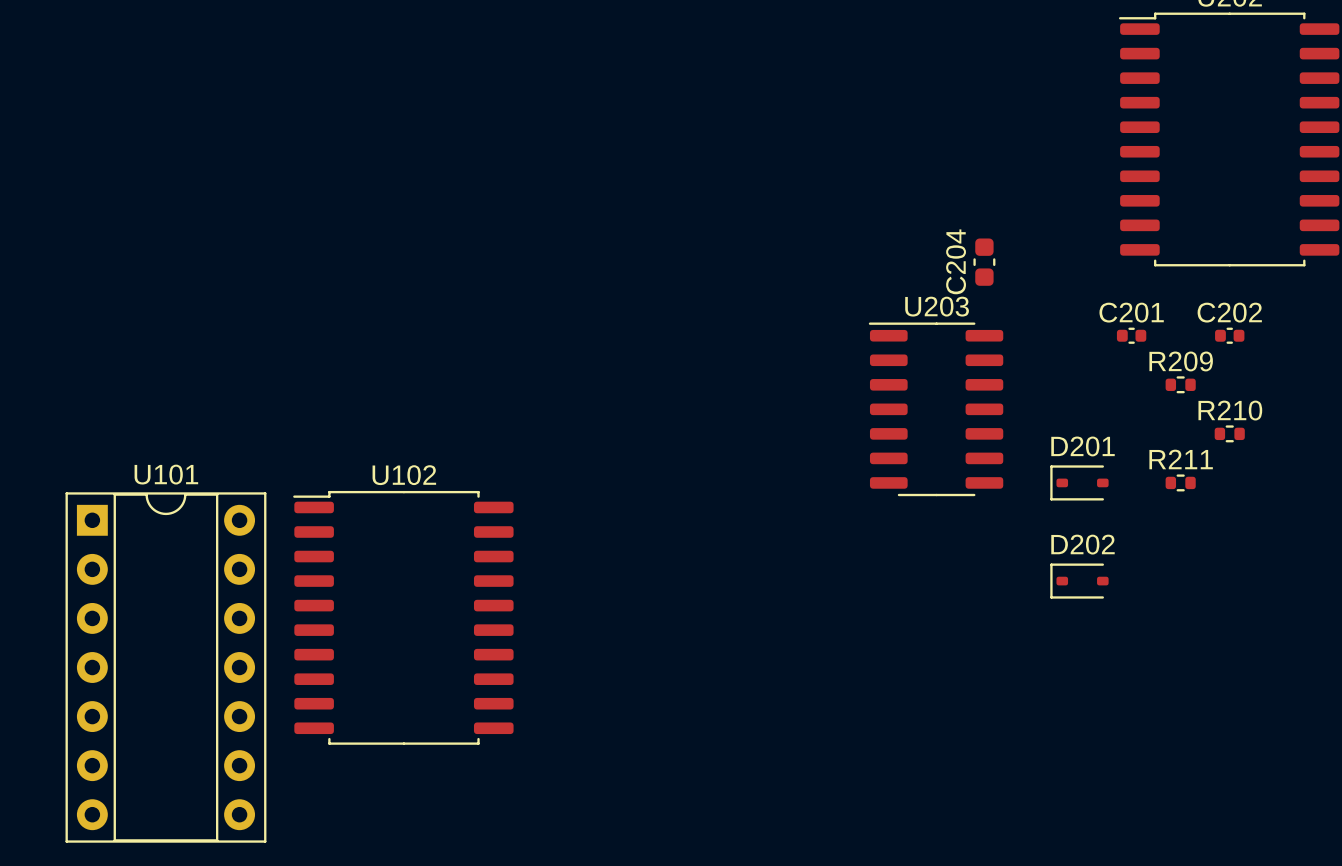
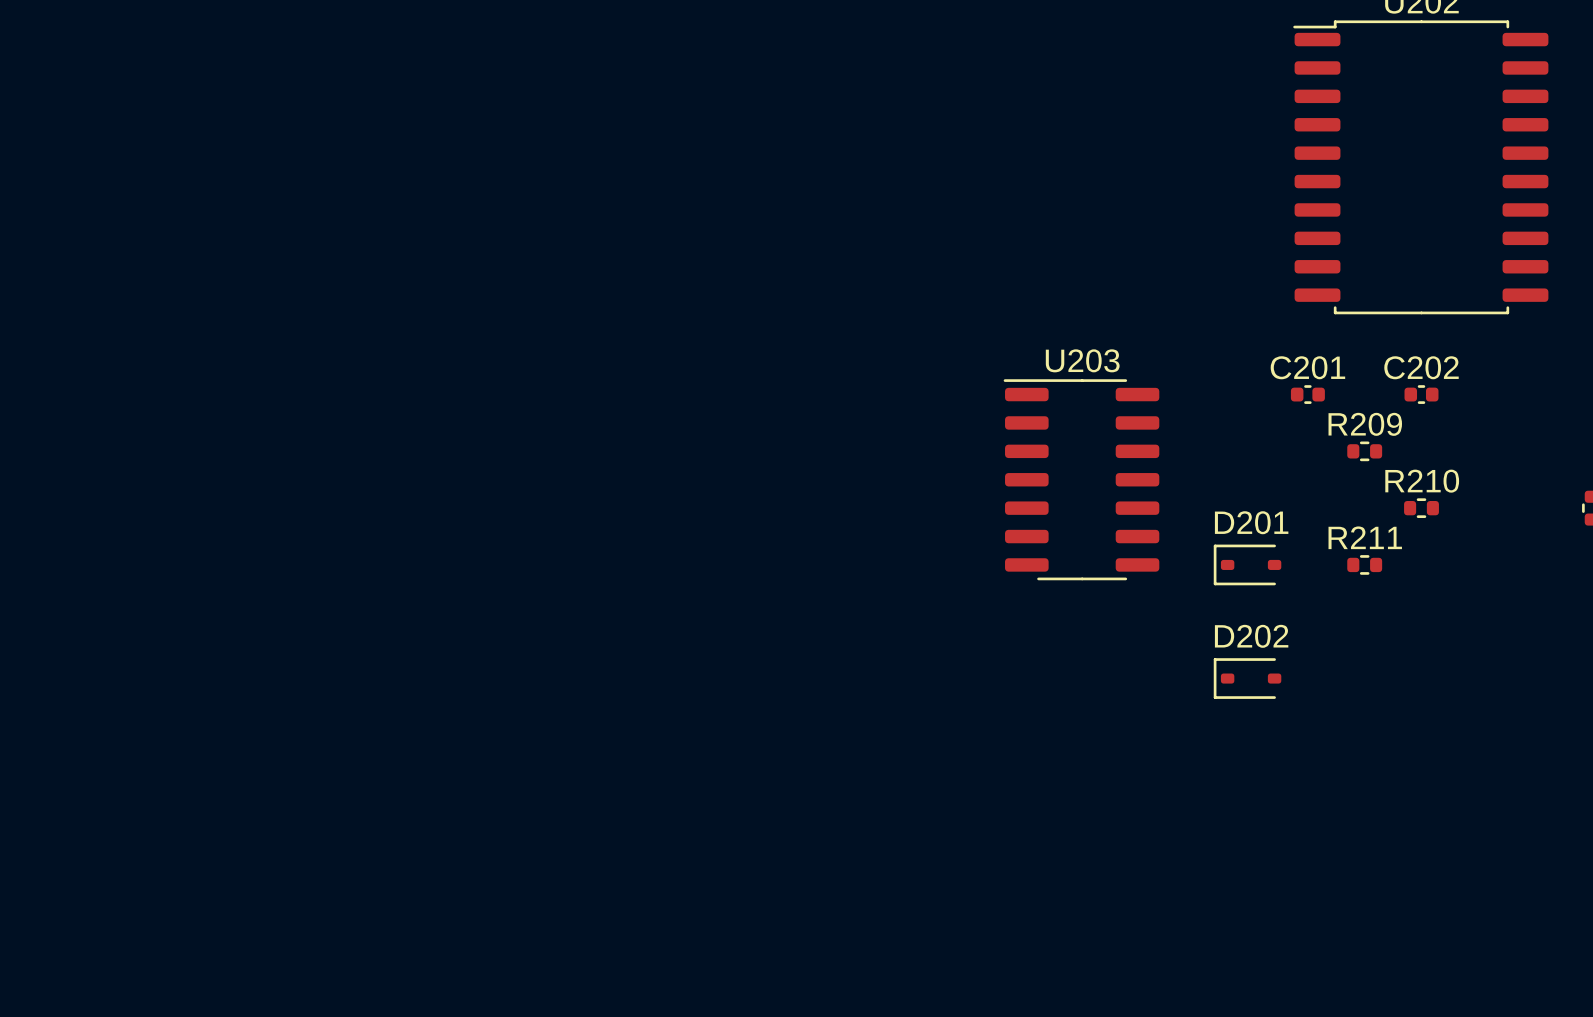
C204: (984, 262) -> none
U102: (403, 617) -> none
U101: (165, 667) -> none

